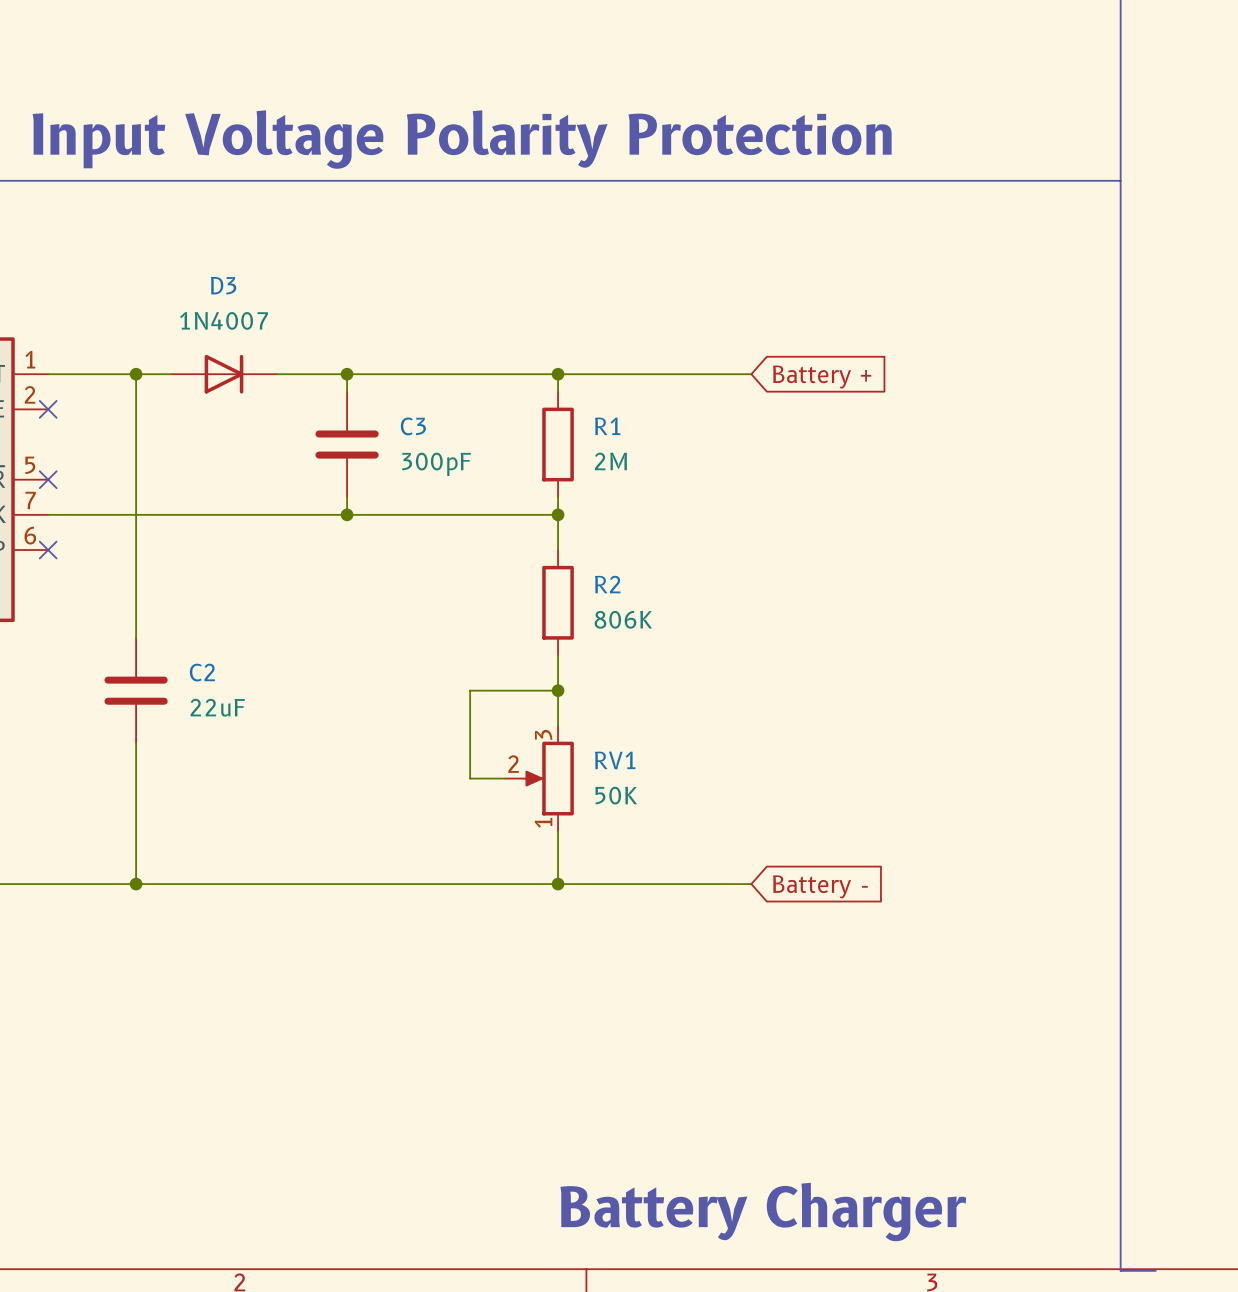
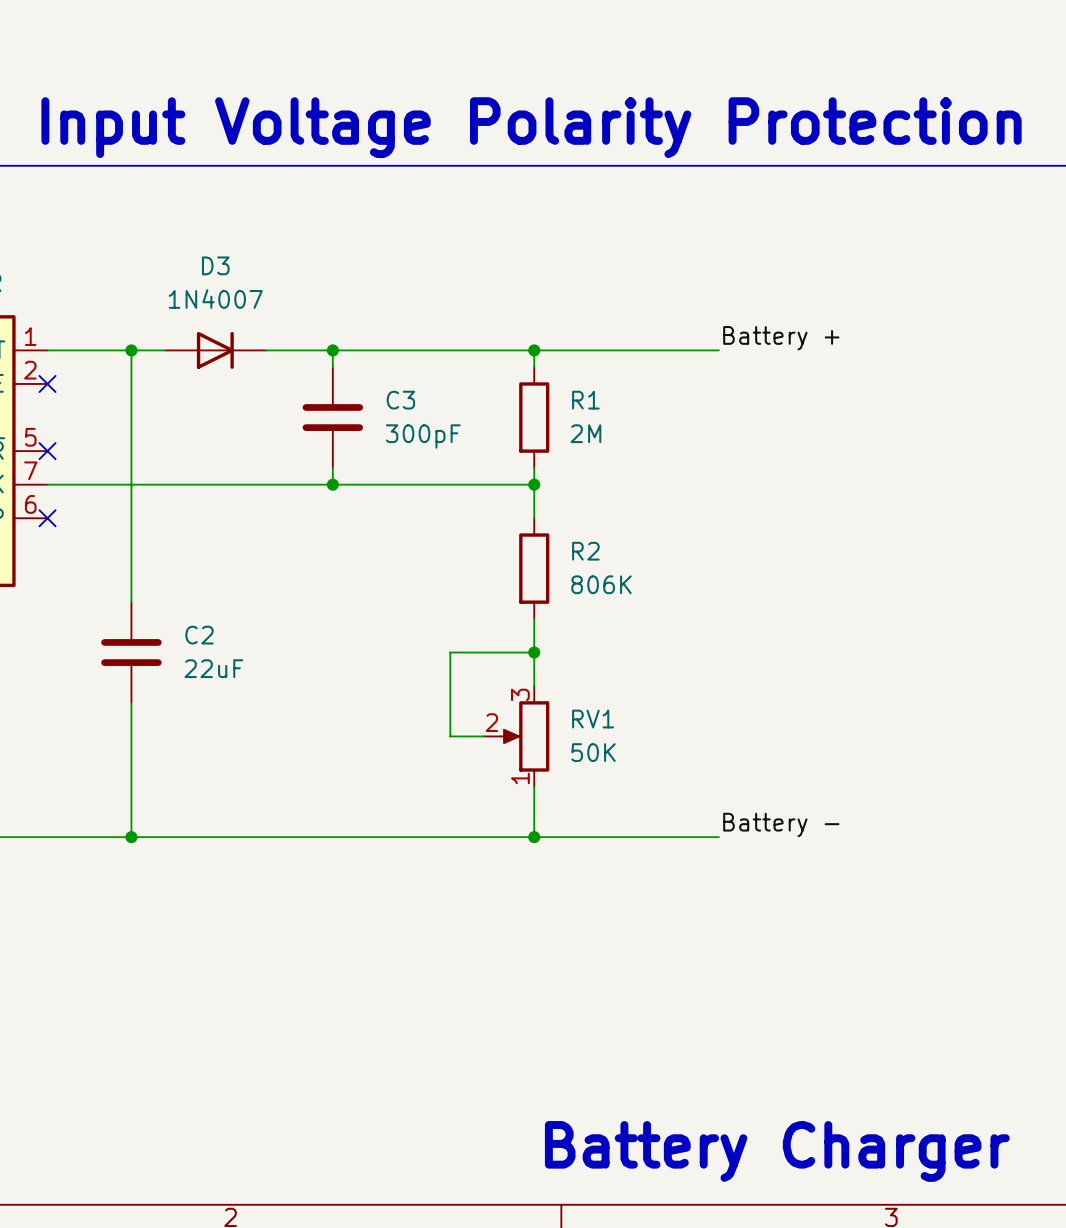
label: none -> Battery + (781, 338)
global label: Battery + (822, 377) -> none
label: none -> Battery - (781, 824)
global label: Battery - (820, 886) -> none

